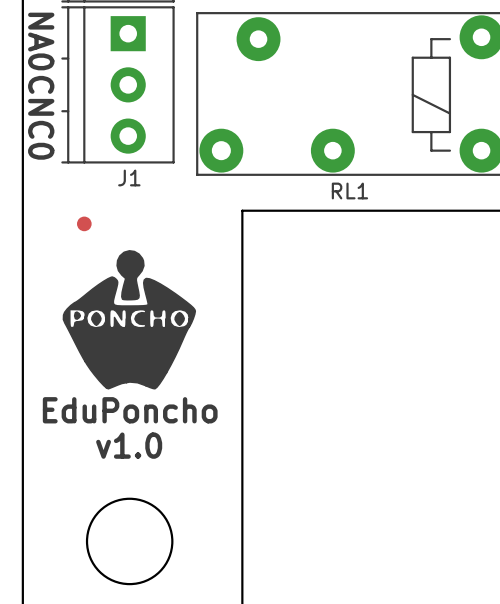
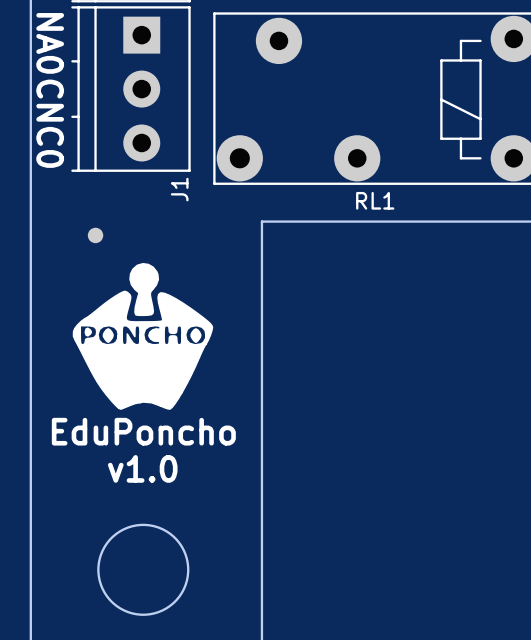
J1 name rotation: 0° (129, 177) -> 90° counterclockwise (179, 189)
J1 name position: J1 (129, 177) -> J1 (179, 189)

